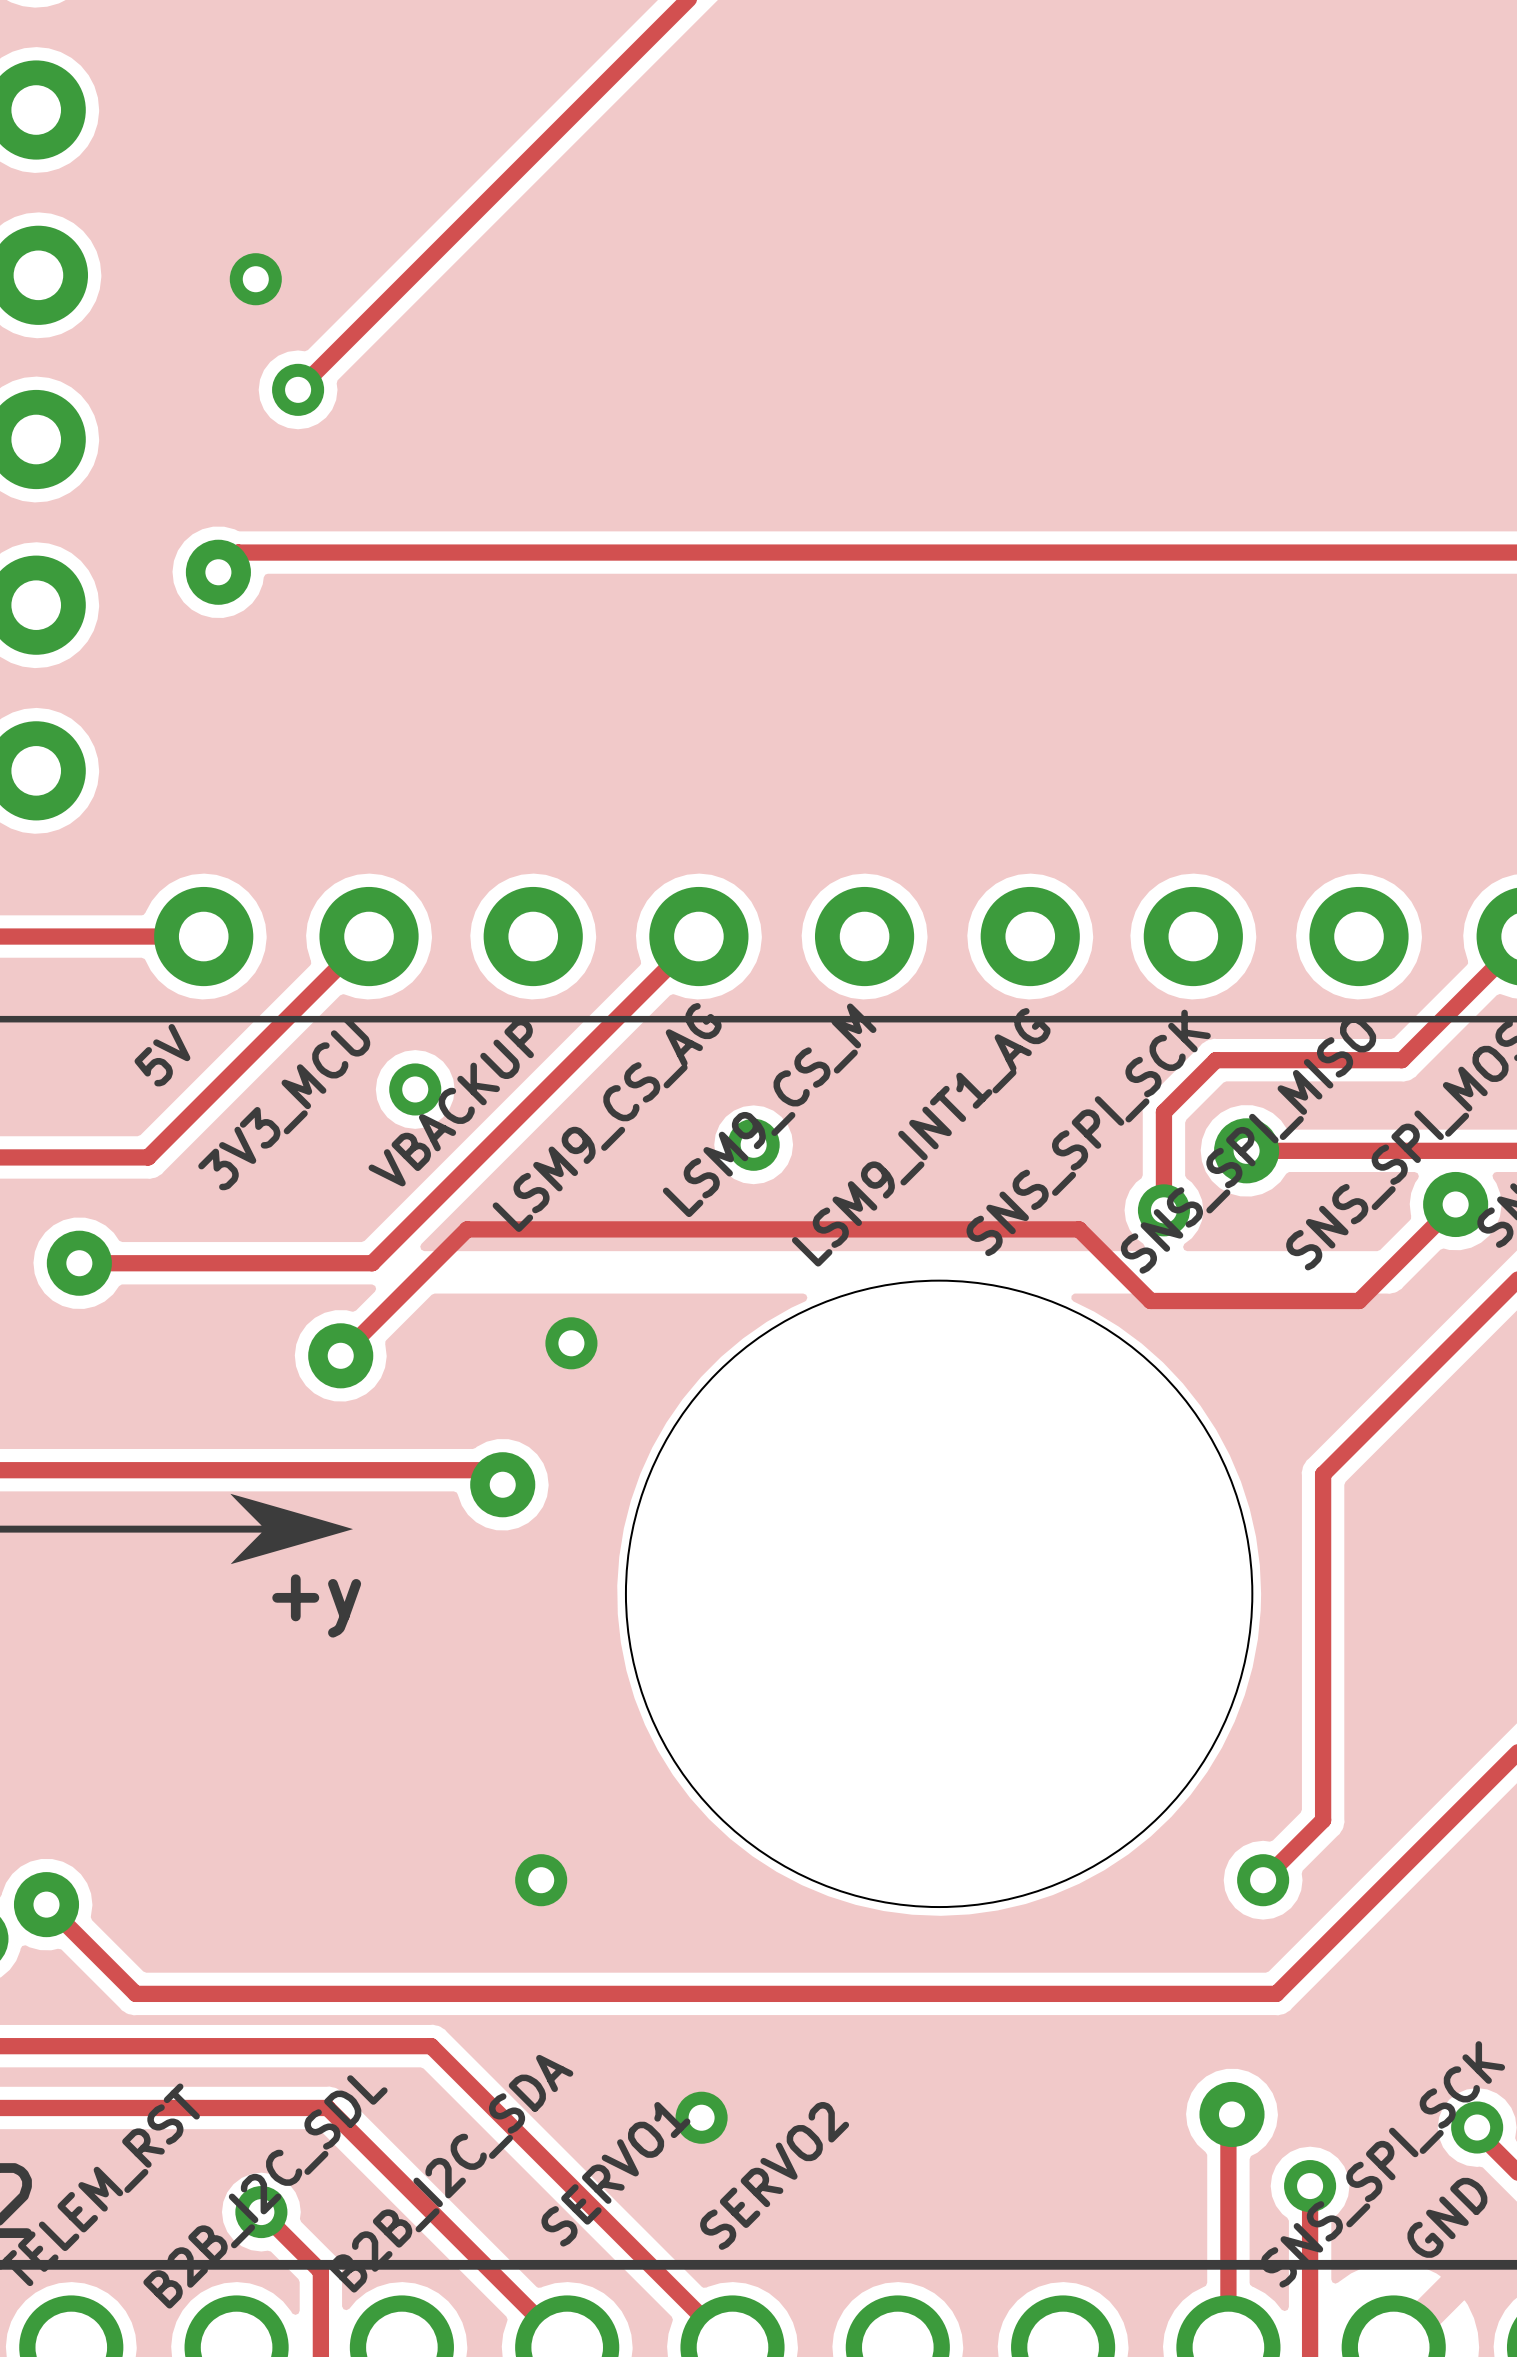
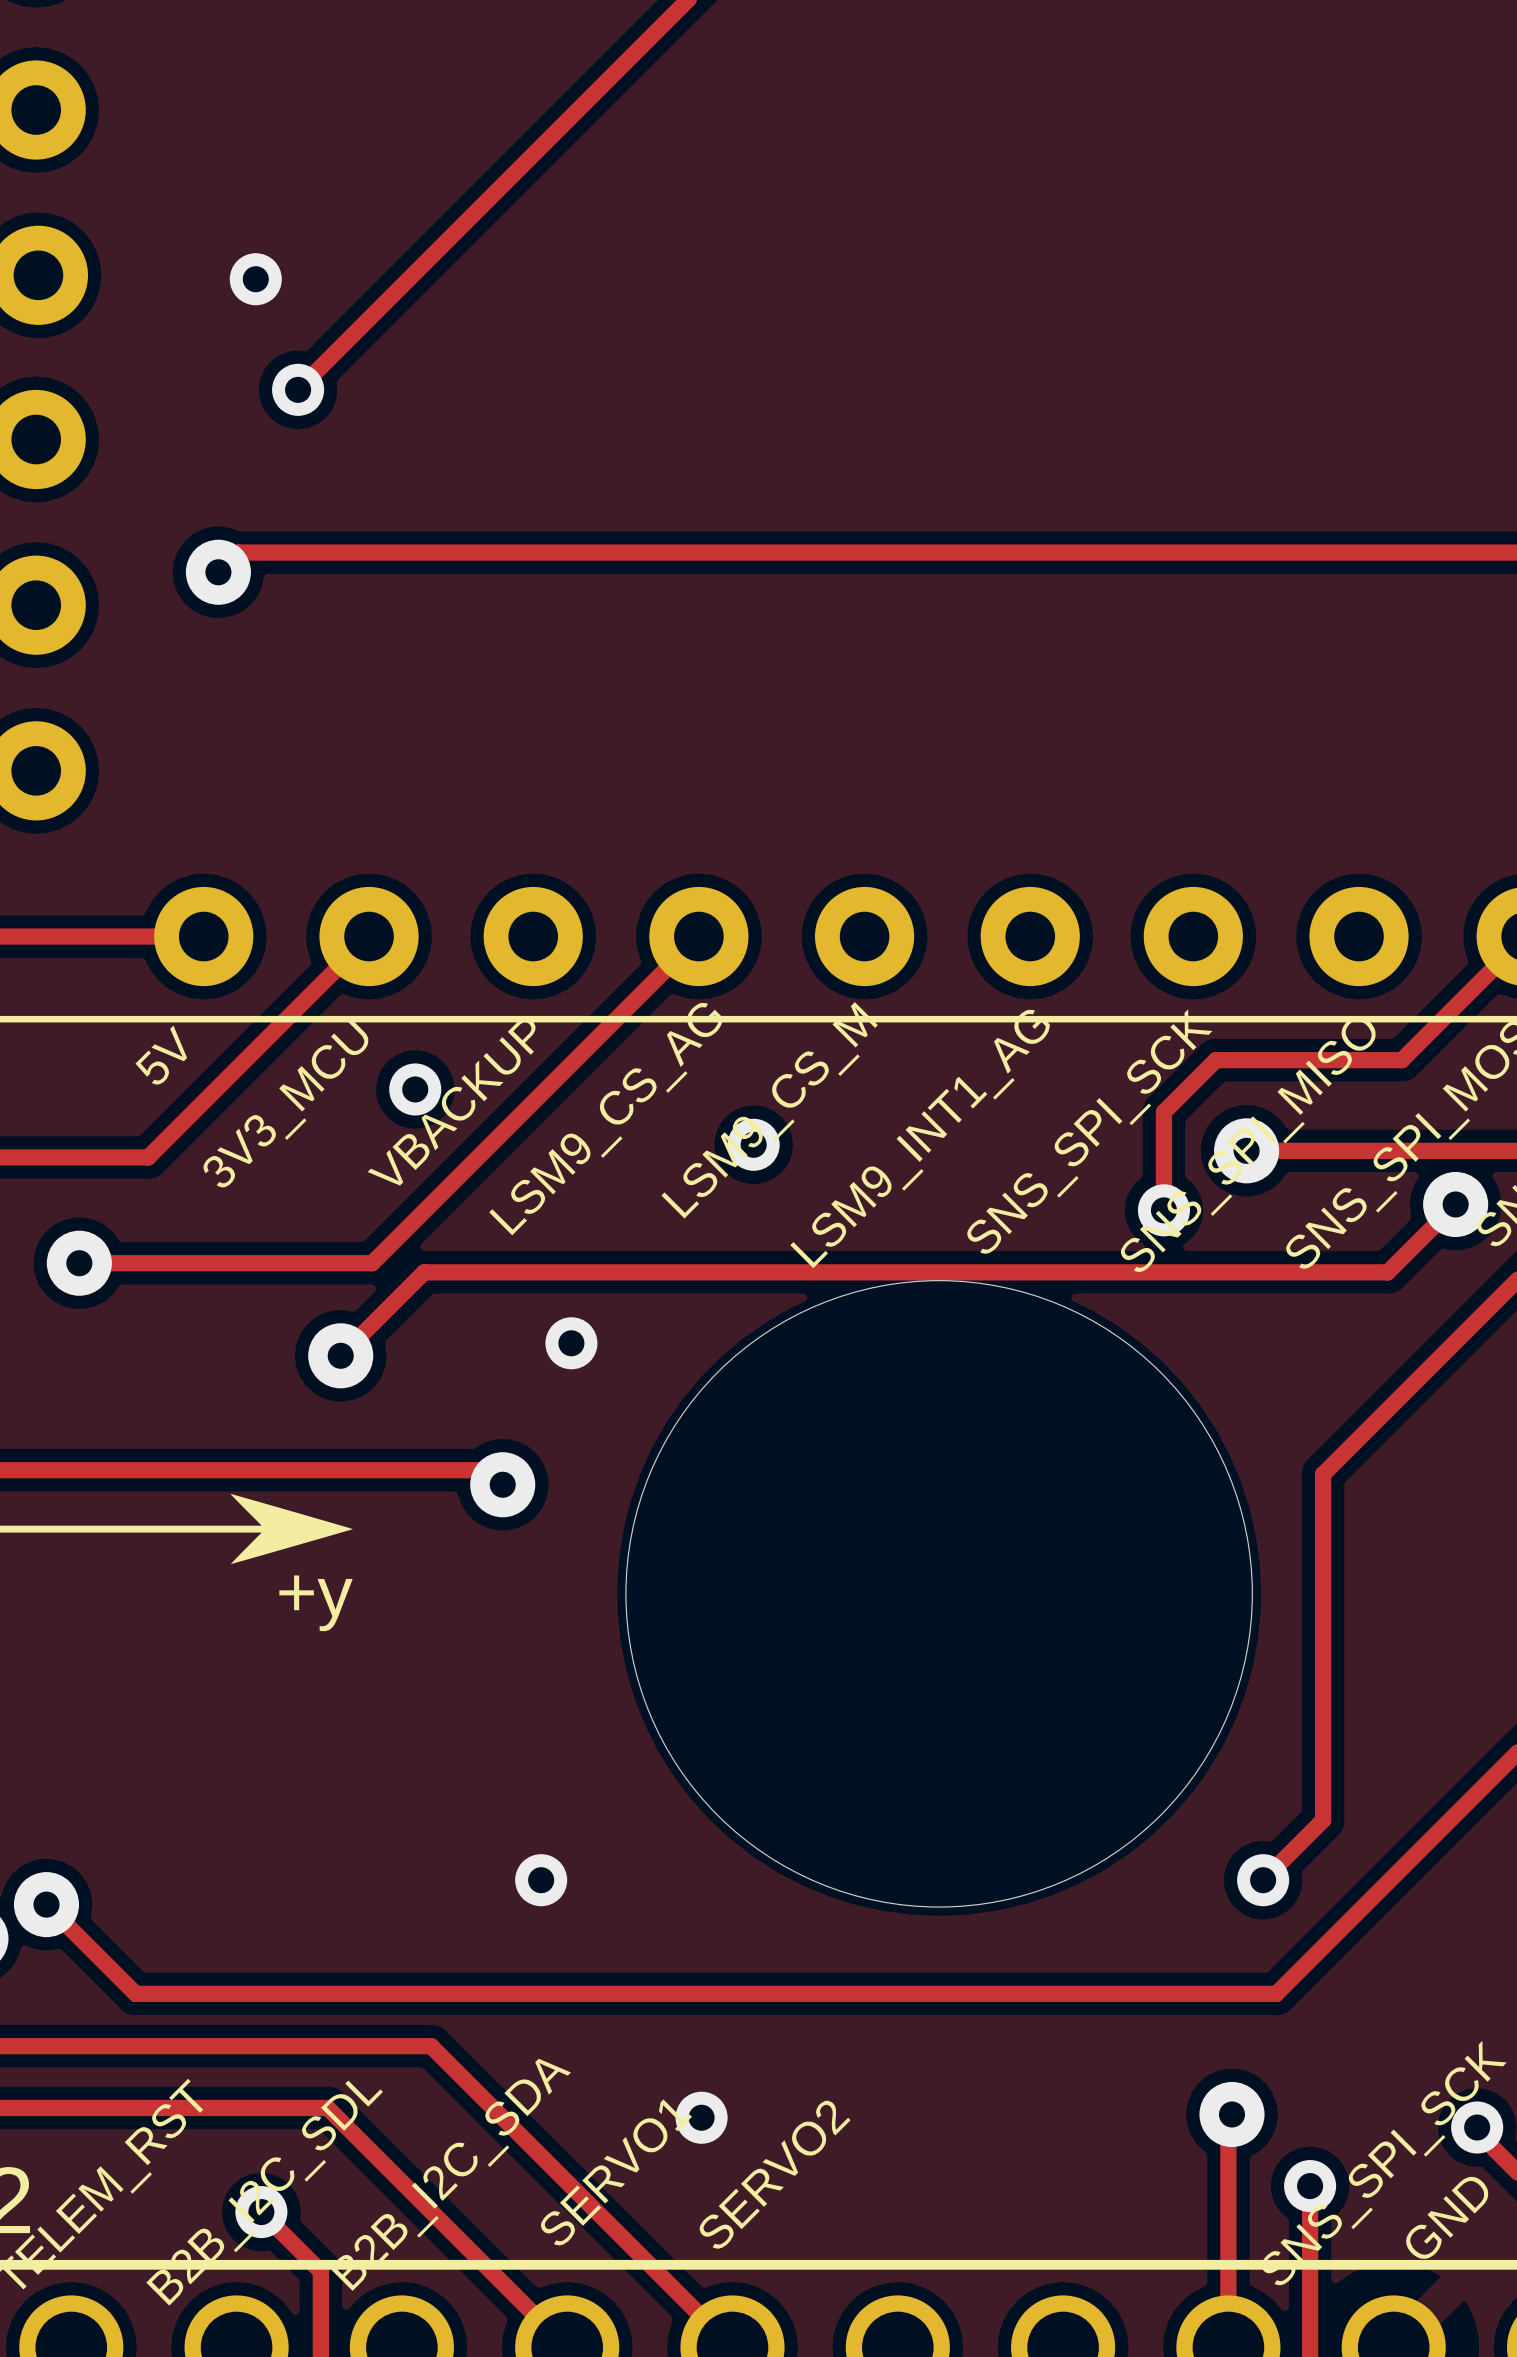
track: (424, 1272) (467, 1229) (1079, 1229) (1150, 1300) (1359, 1300) (1387, 1272) -> (424, 1272) (1387, 1272)

